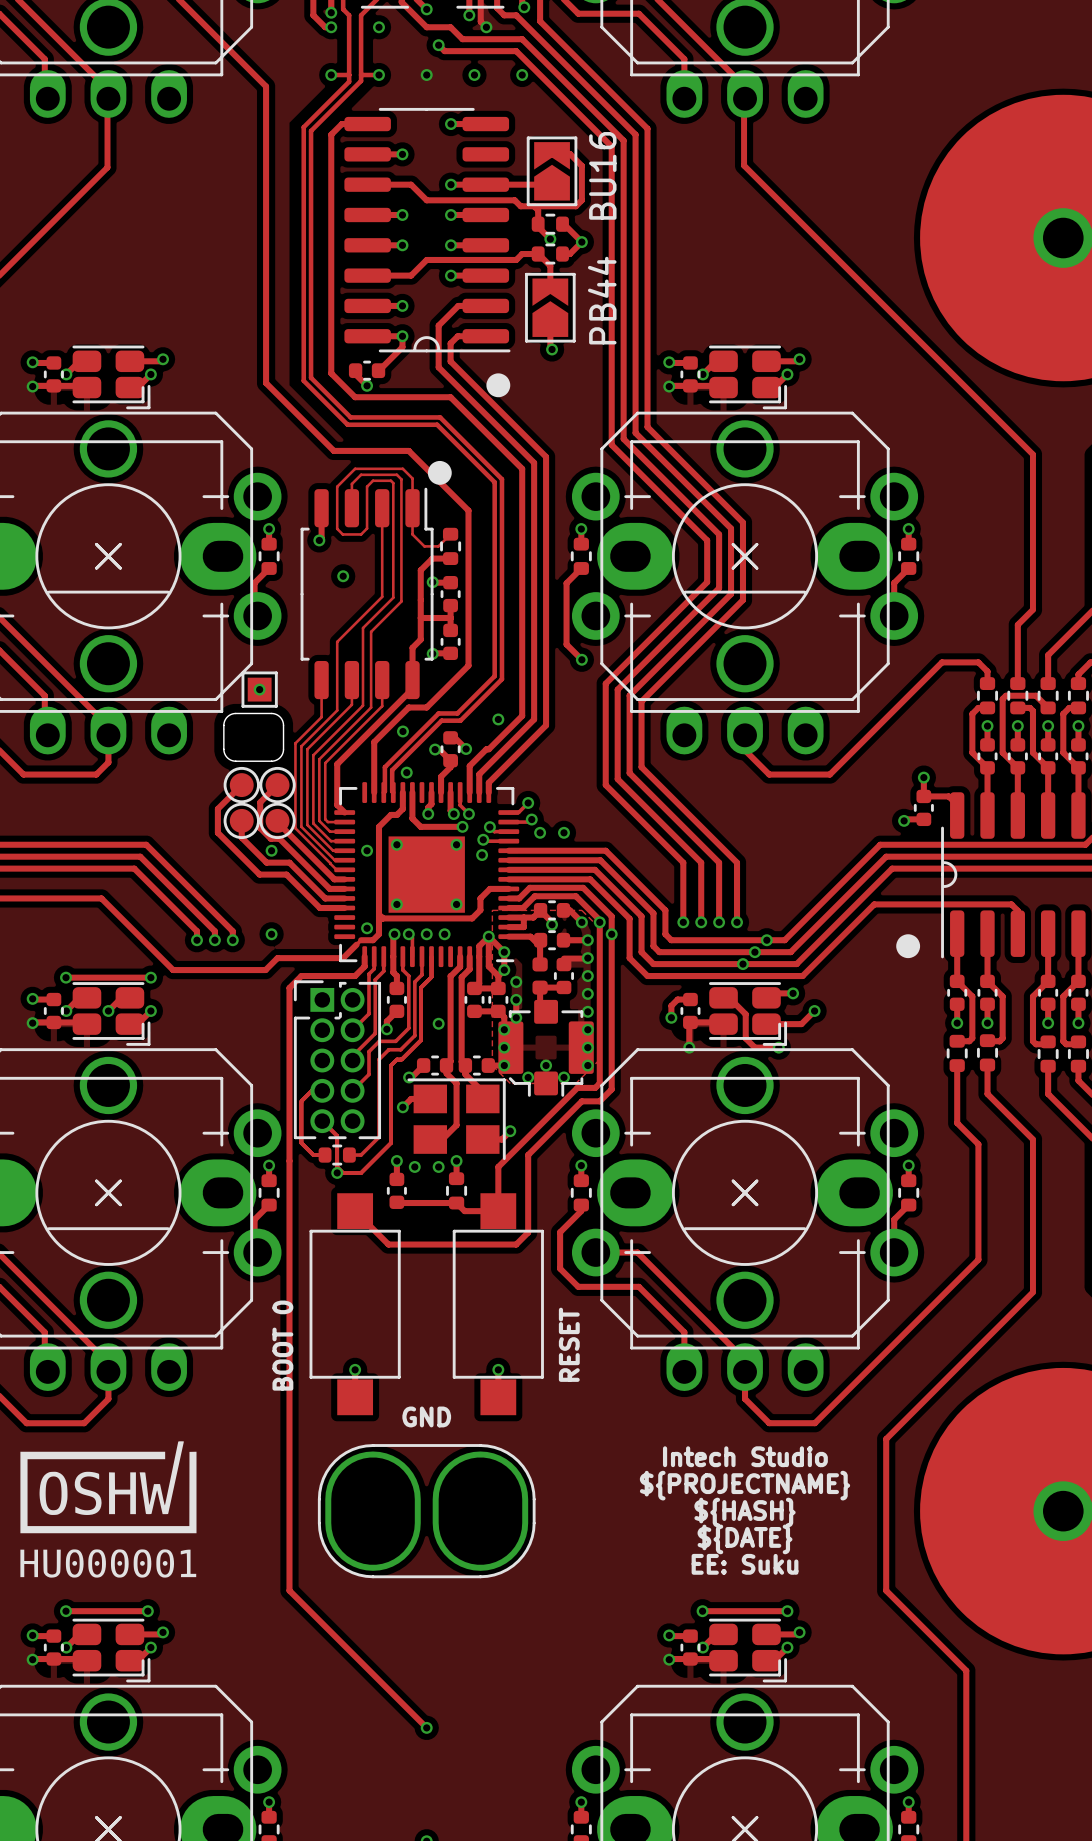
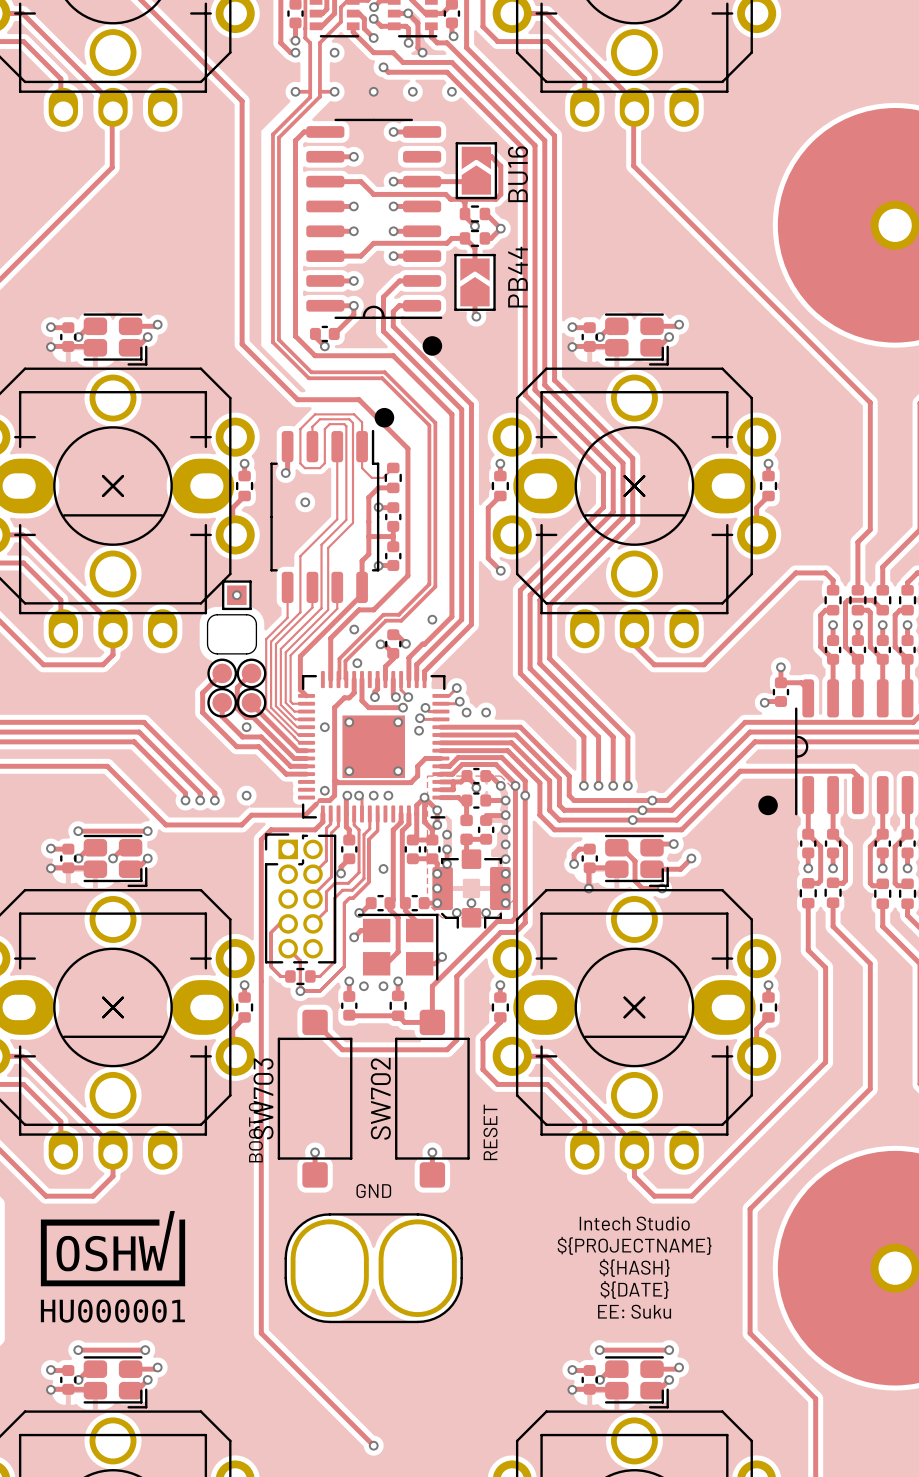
part: (355, 1304) -> none
SW703: none -> (315, 1098)
part: (498, 1304) -> none
SW702: none -> (432, 1098)

